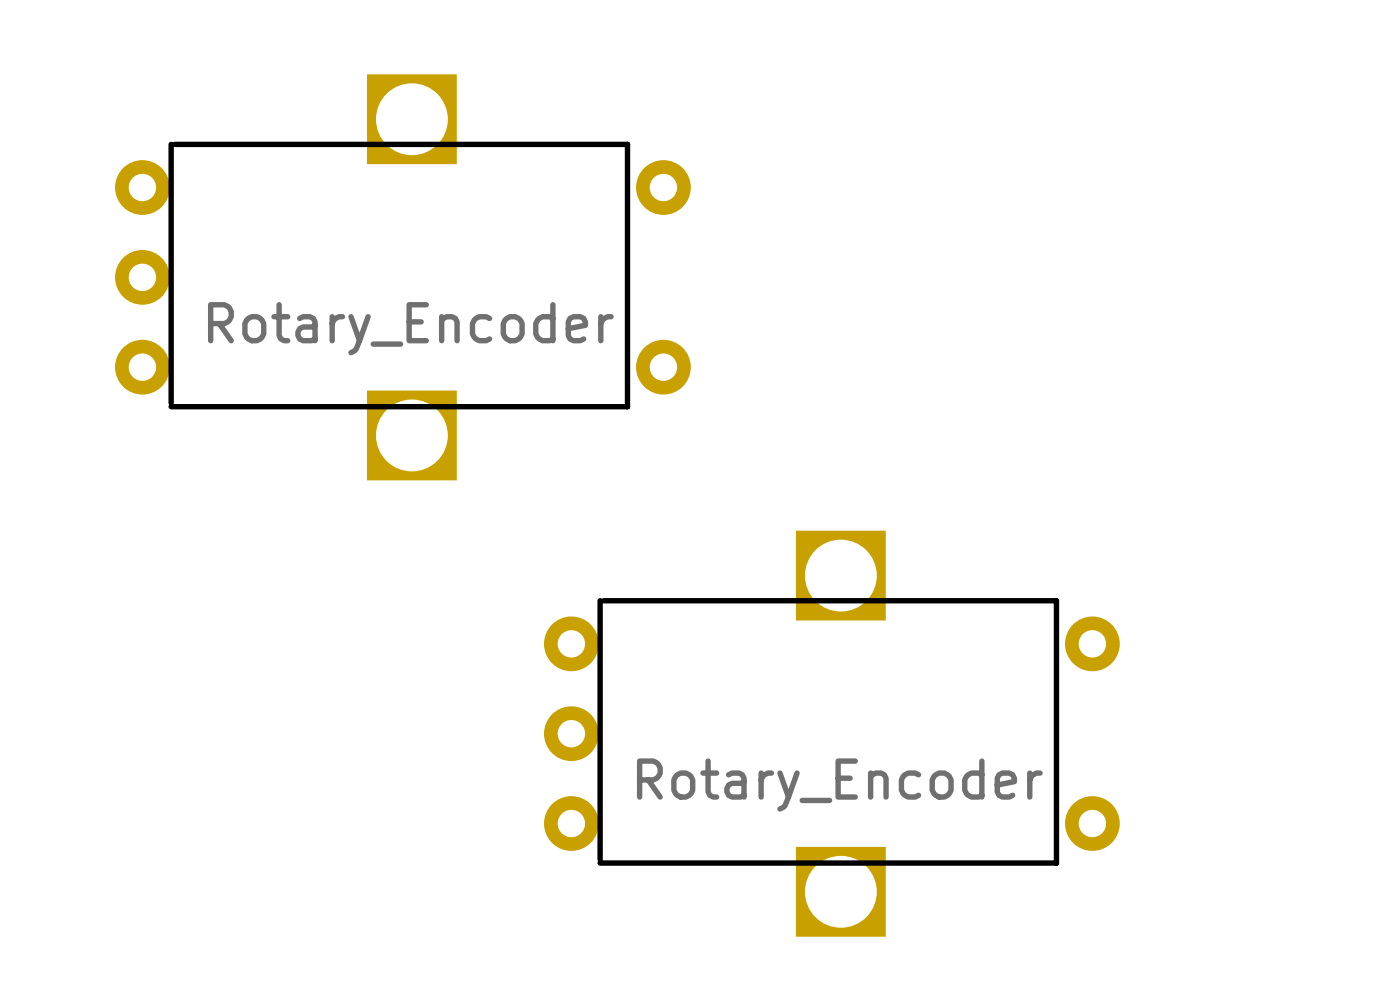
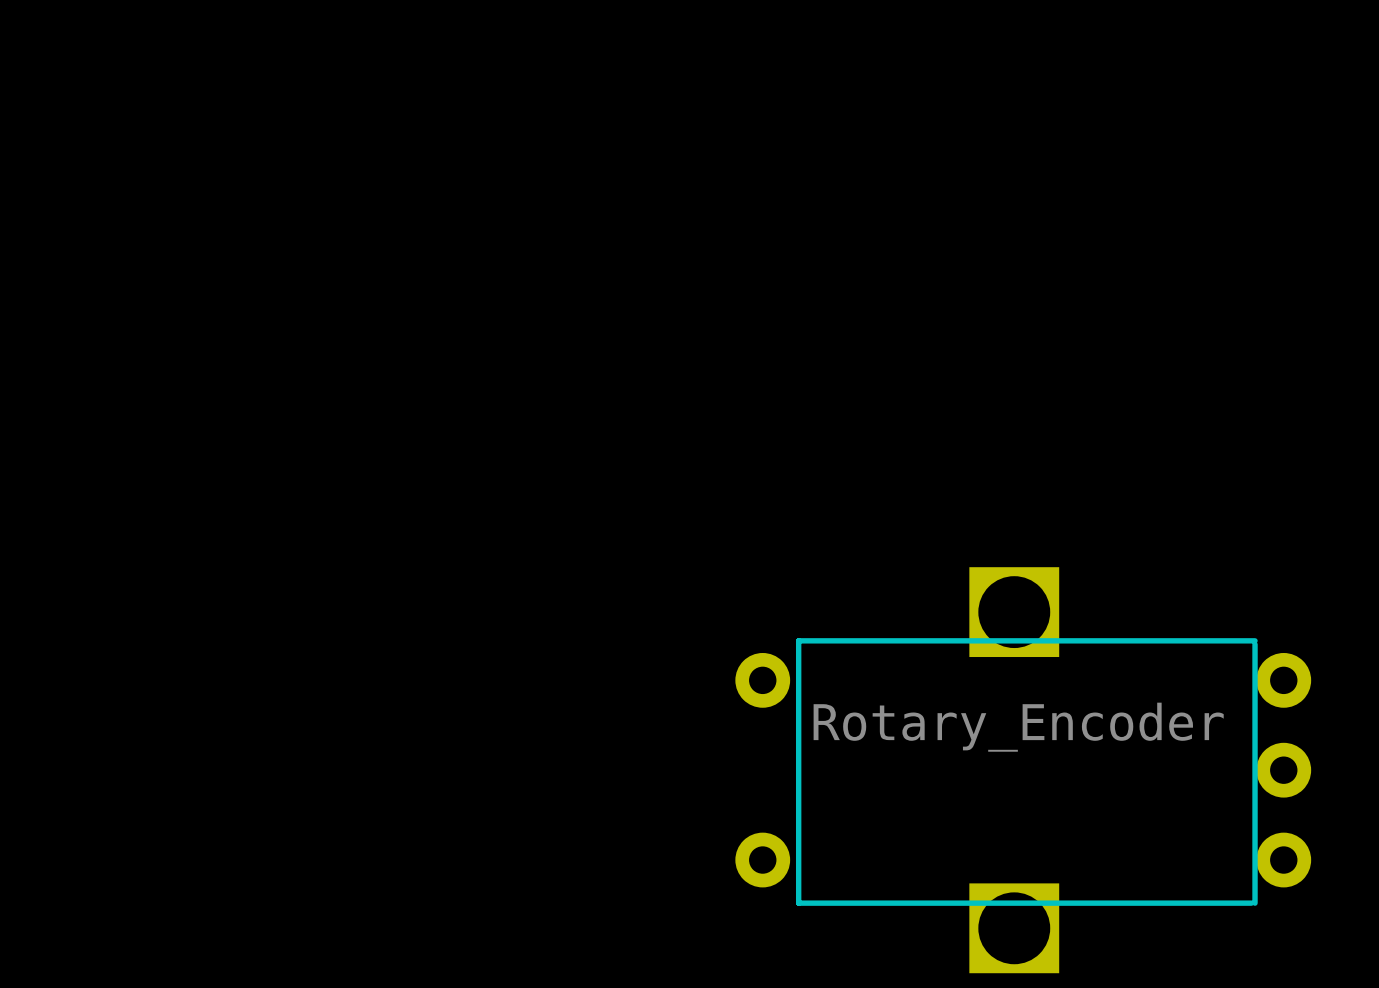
part: Rotary_Encoder (402, 277) -> none
part rotation: 0° (831, 733) -> 180° (1023, 770)

